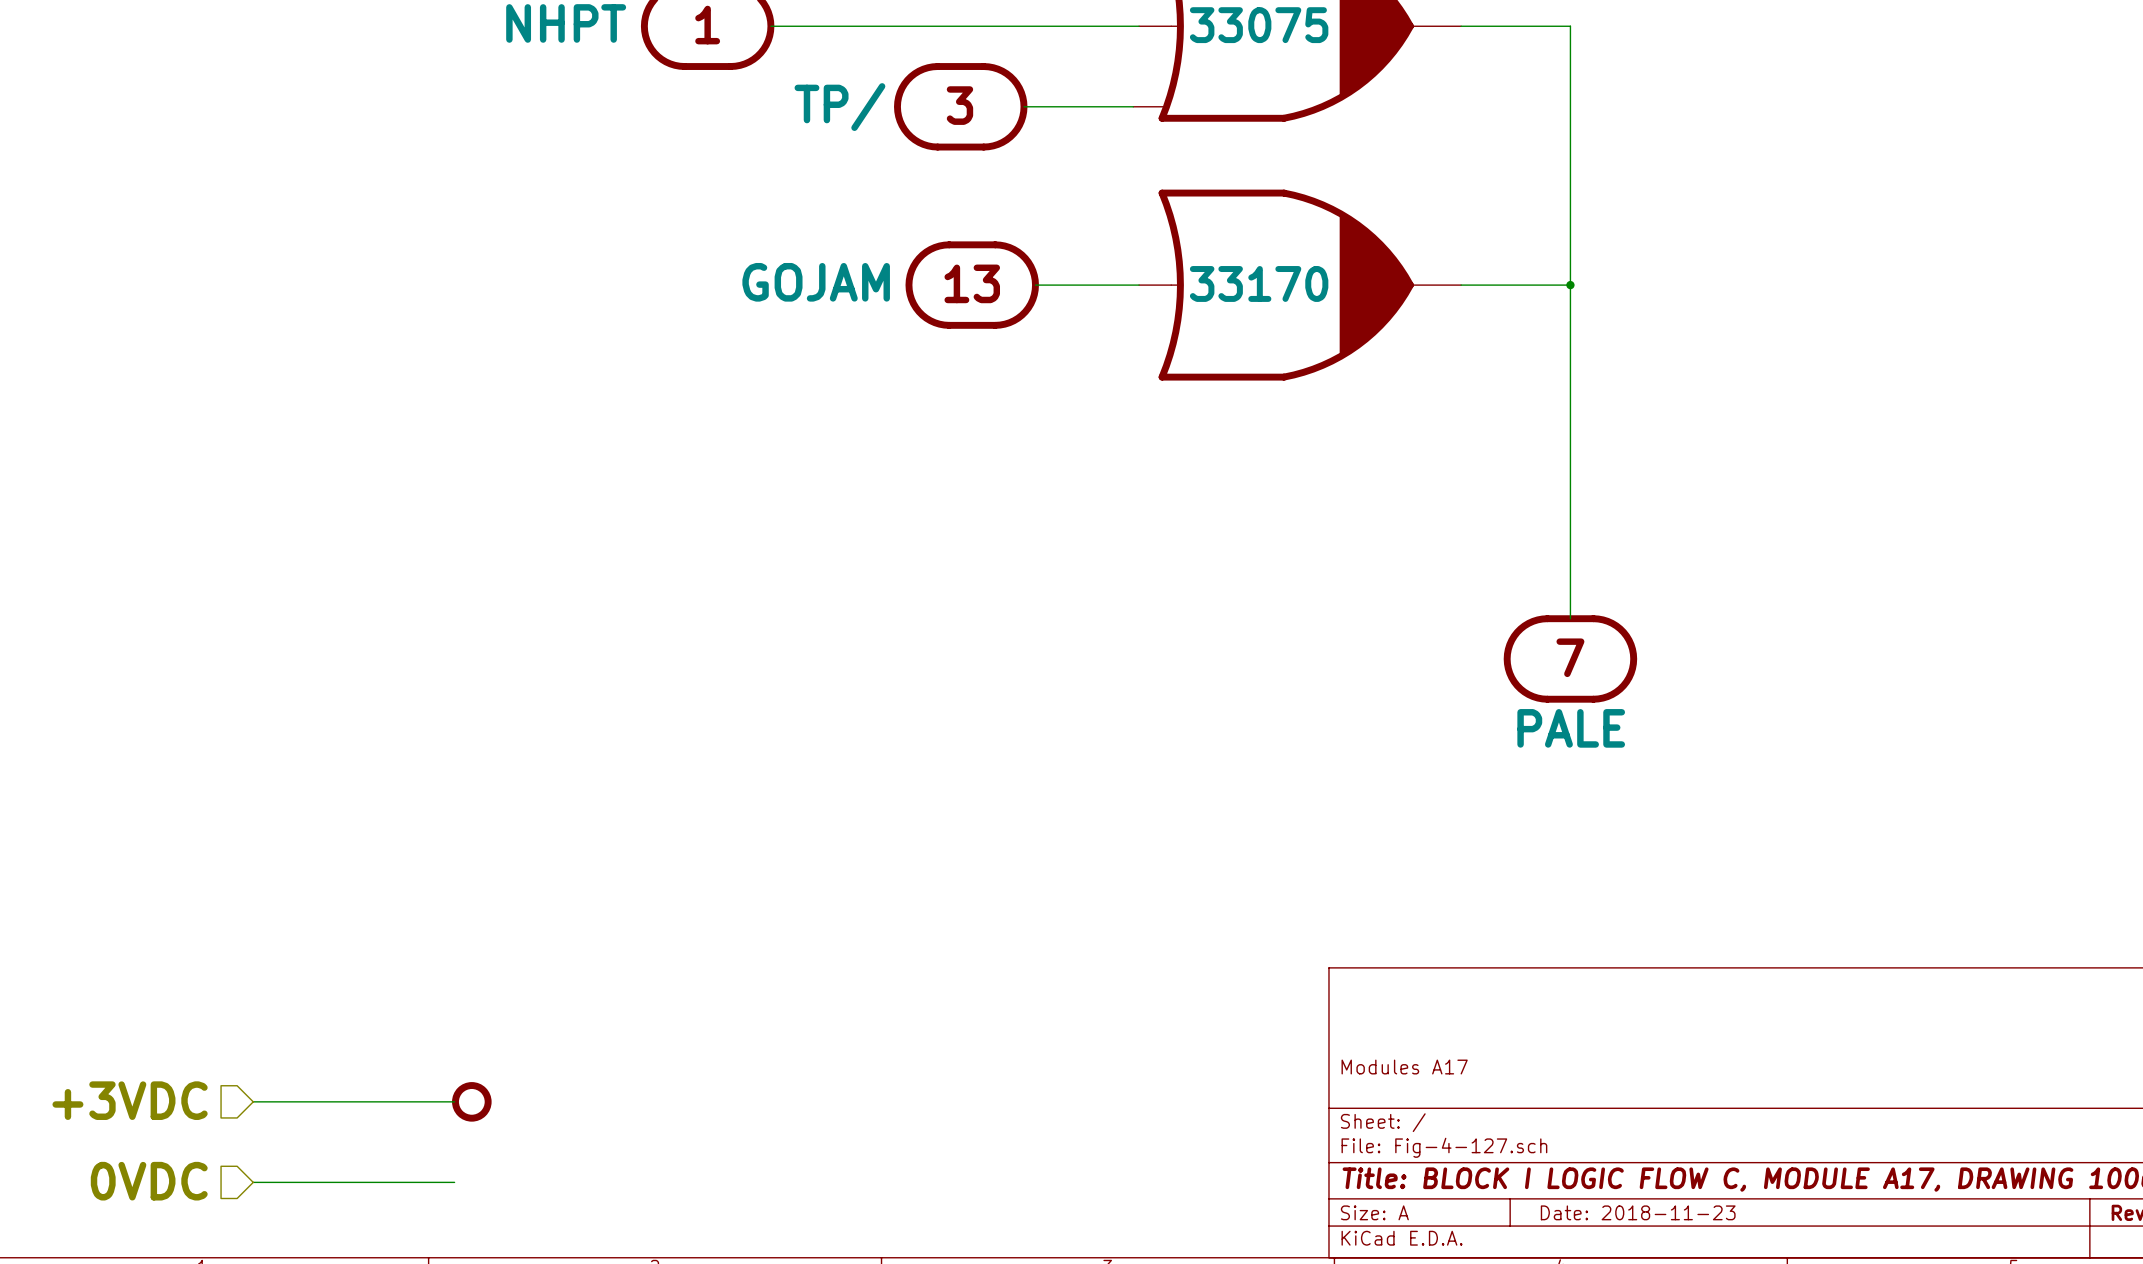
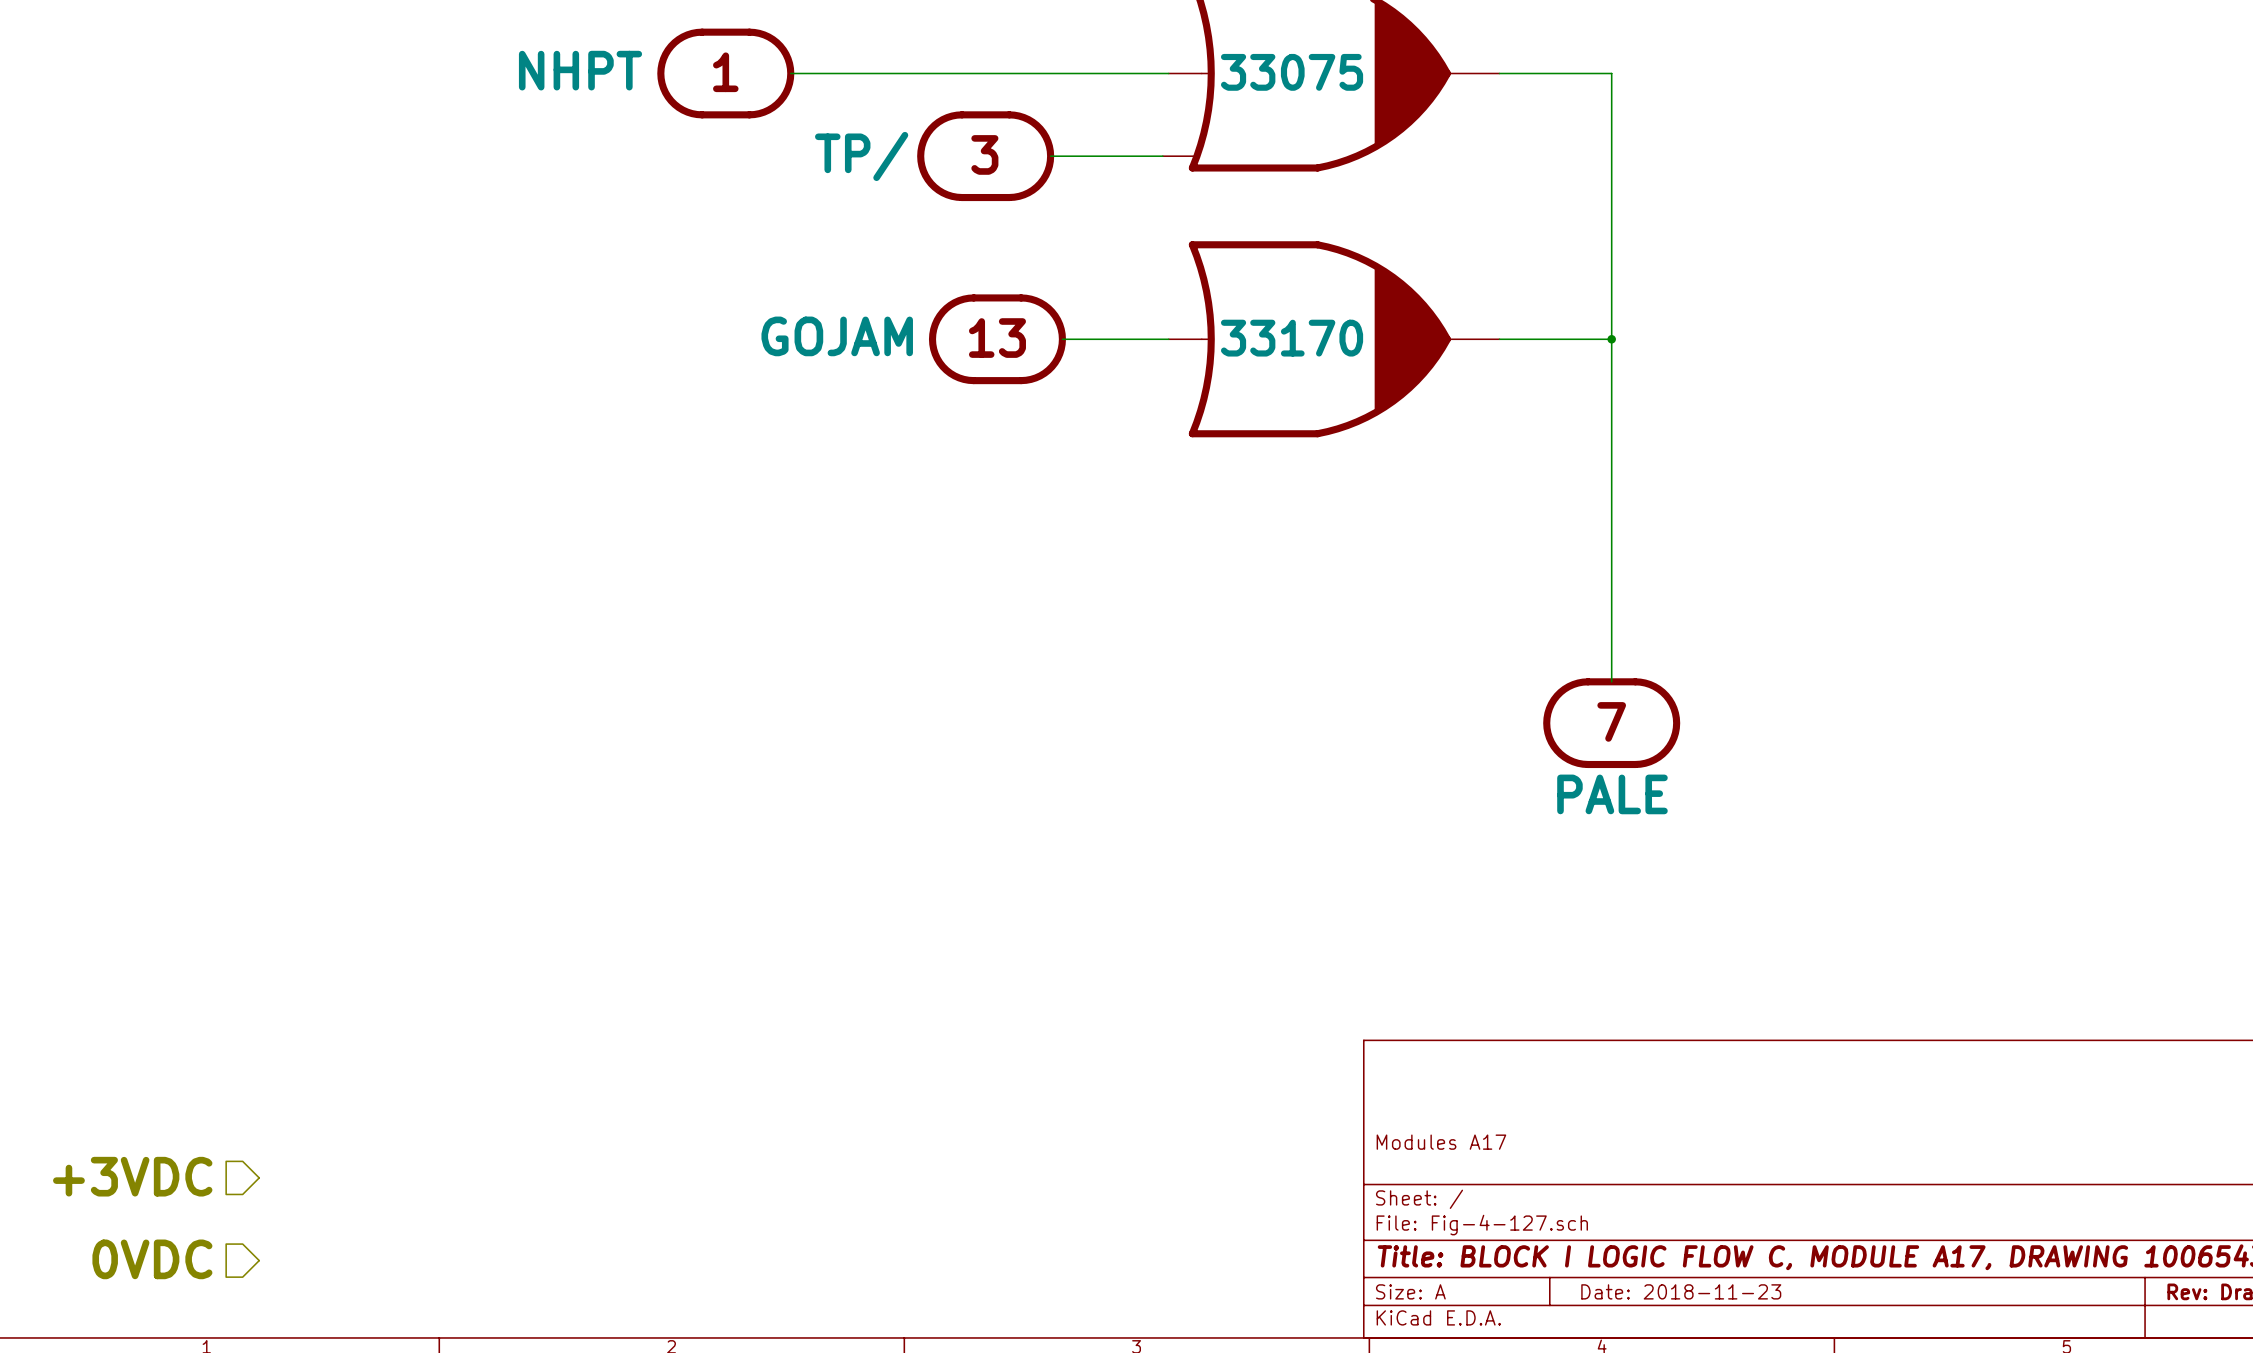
wire: (253, 1101) (454, 1101) -> none
part: (471, 1101) -> none
wire: (253, 1182) (454, 1182) -> none

